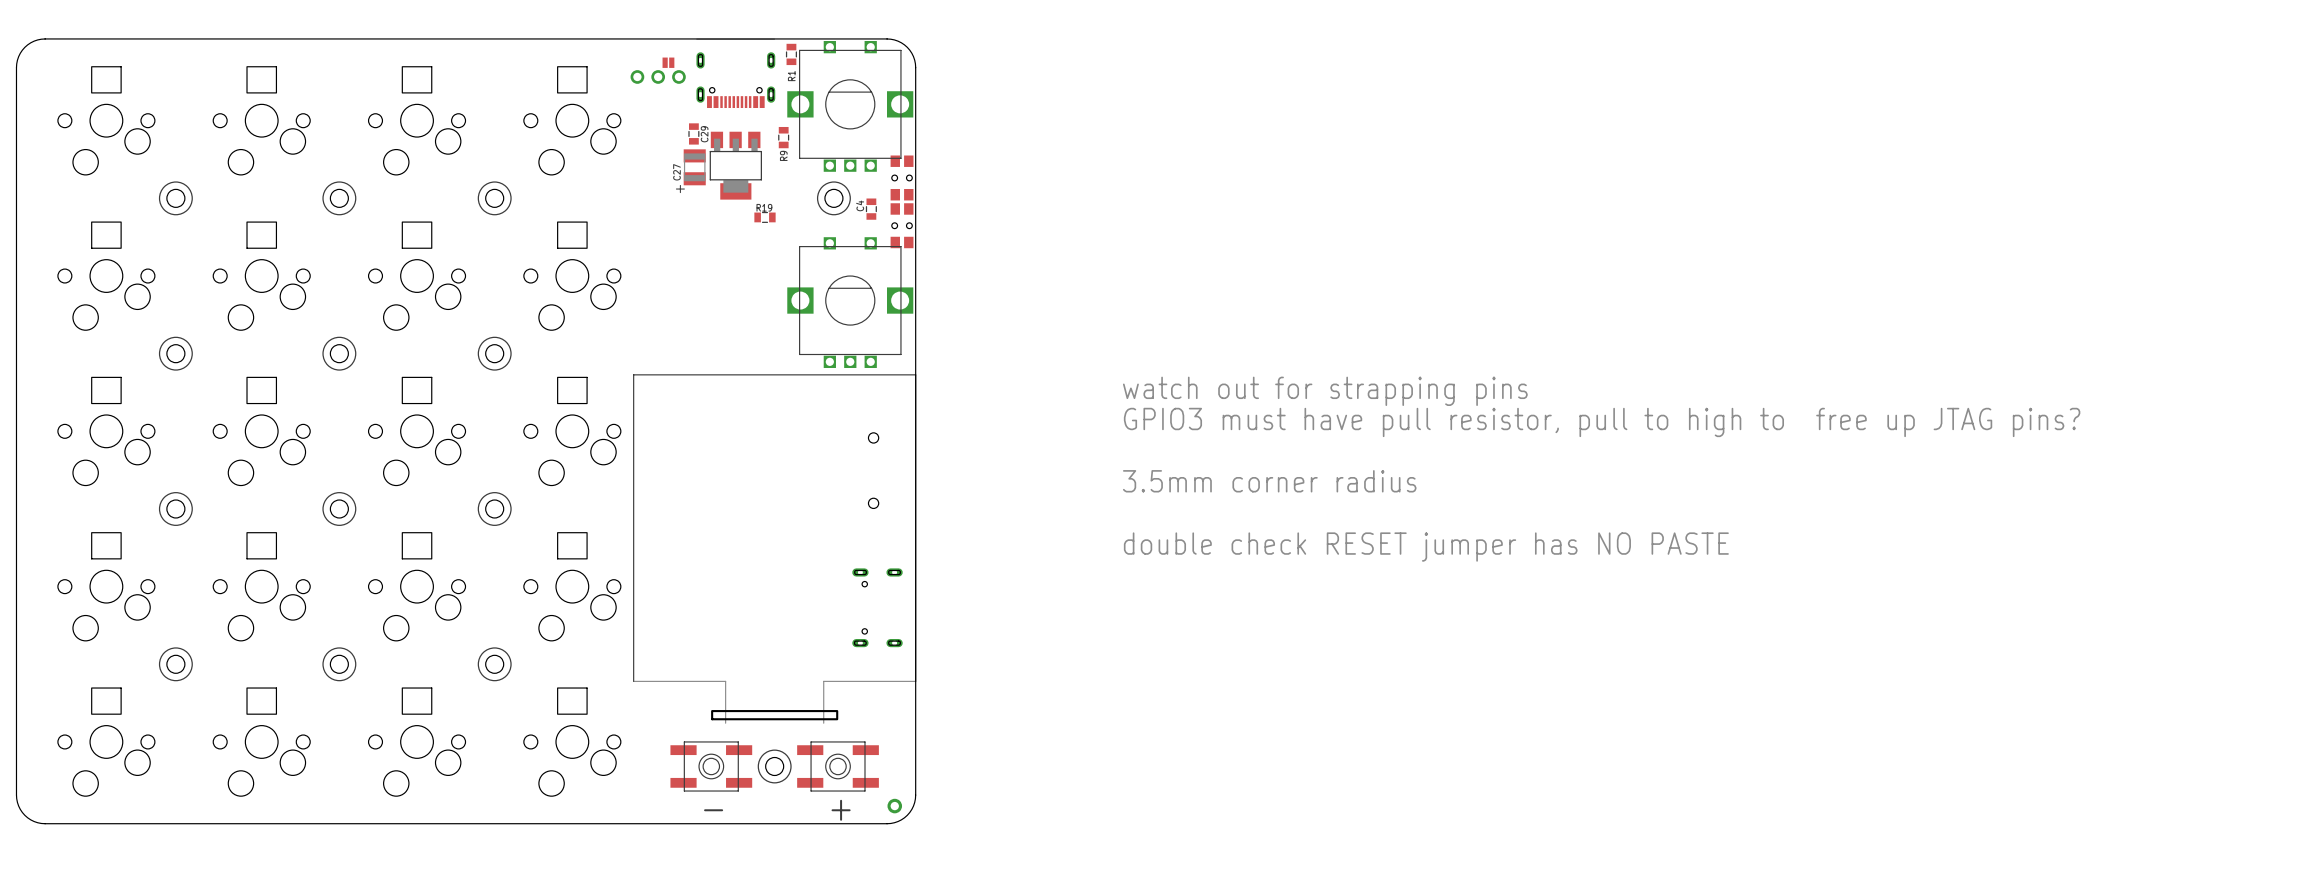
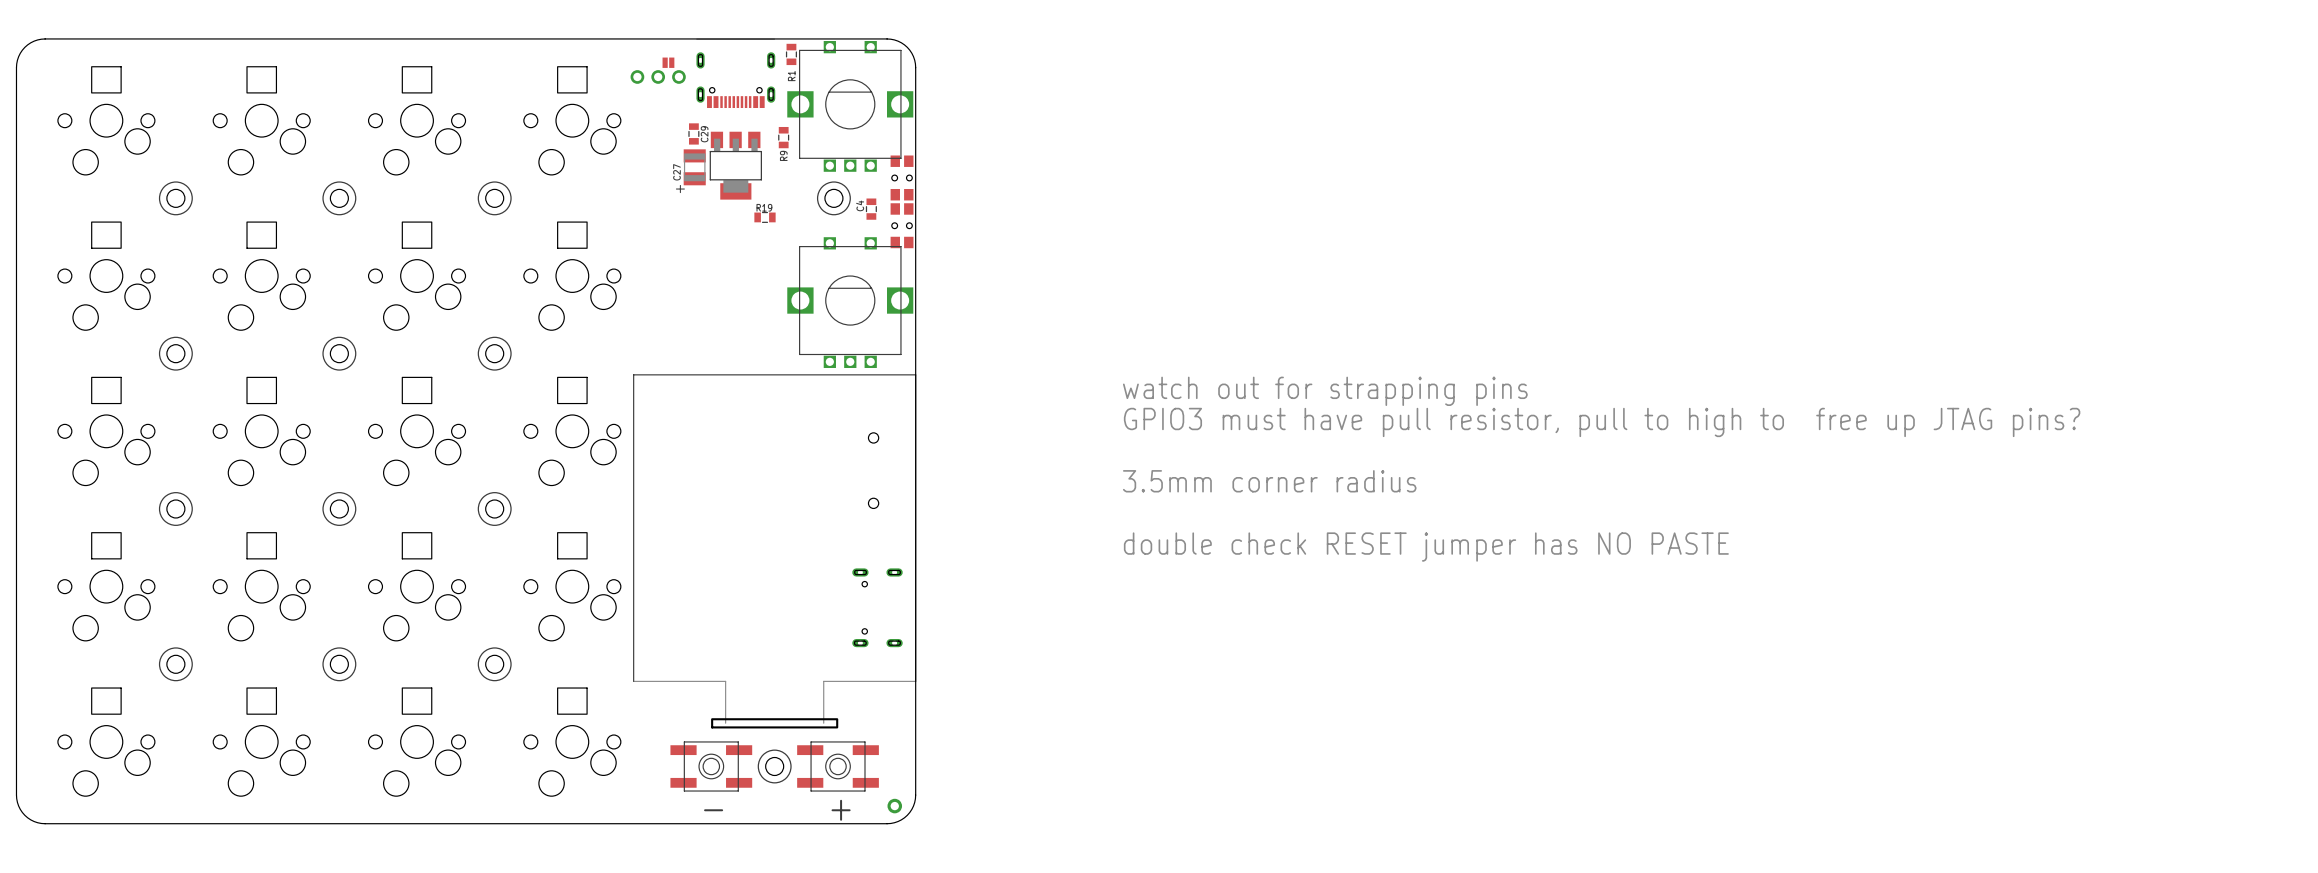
part footprint: [633, 374, 917, 724] -> [633, 374, 917, 729]

